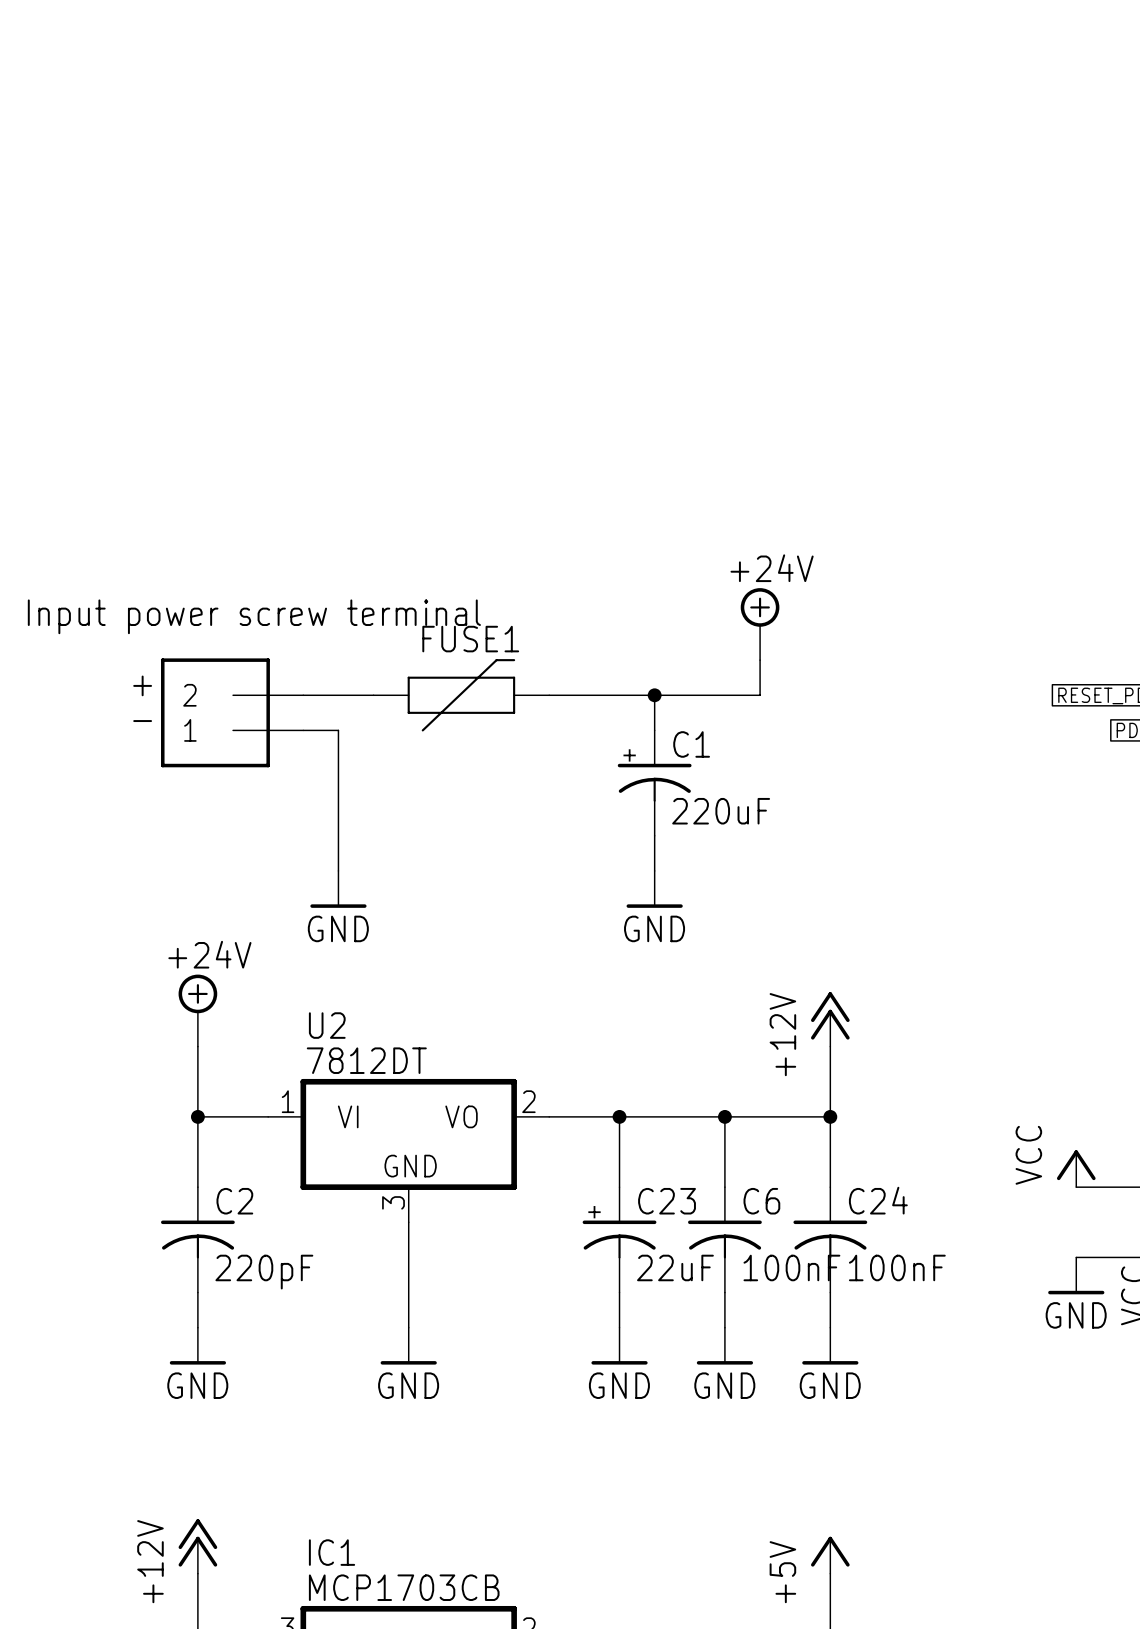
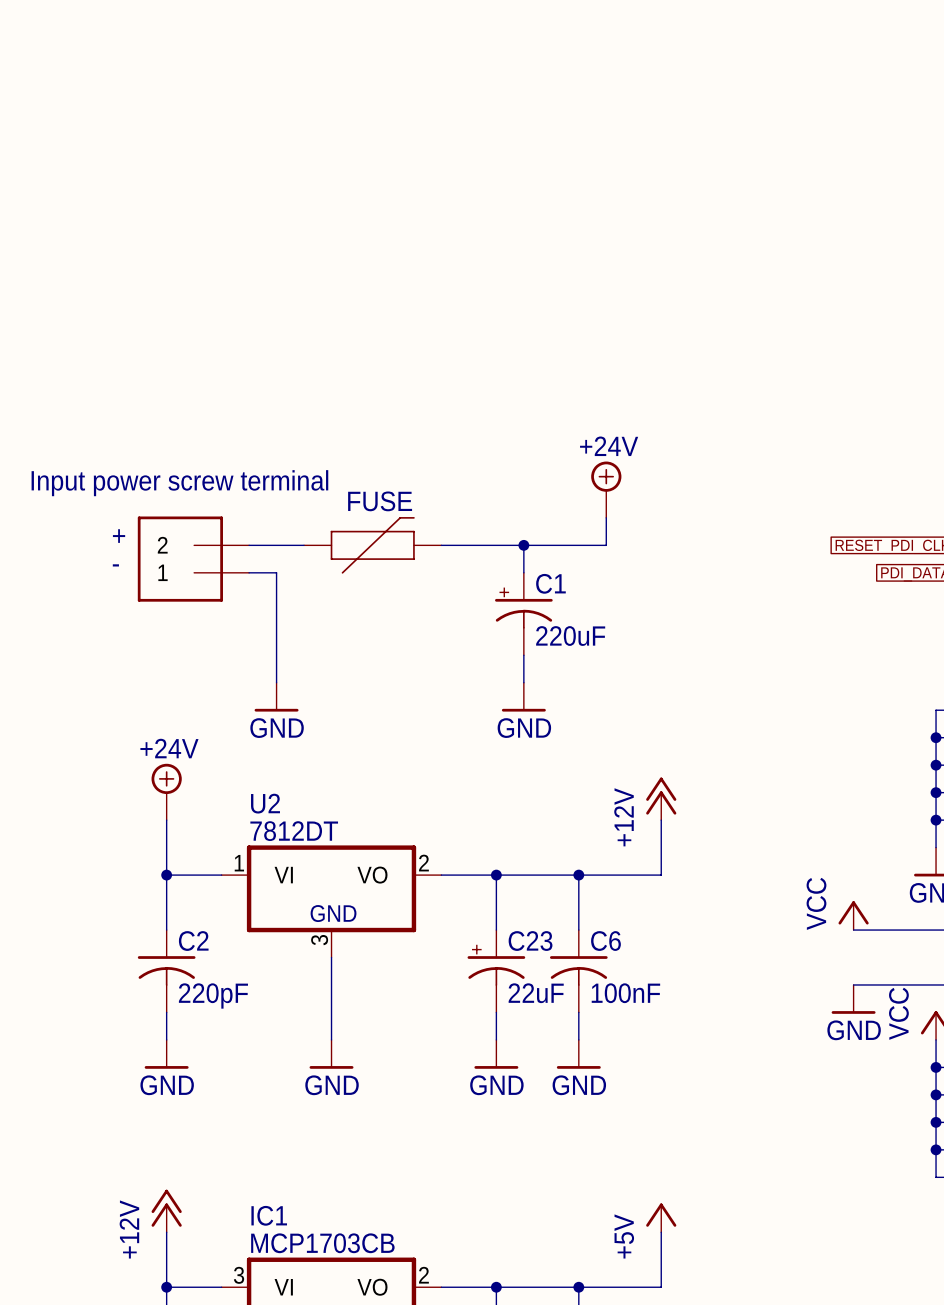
FUSE1 name: FUSE1 (470, 639) -> FUSE (380, 501)
wire: (830, 1116) (830, 1187) -> none
junction: (830, 1116) -> none
C24: 100nF (830, 1239) -> none
wire: (830, 1292) (830, 1327) -> none
power symbol: GND (830, 1346) -> none

